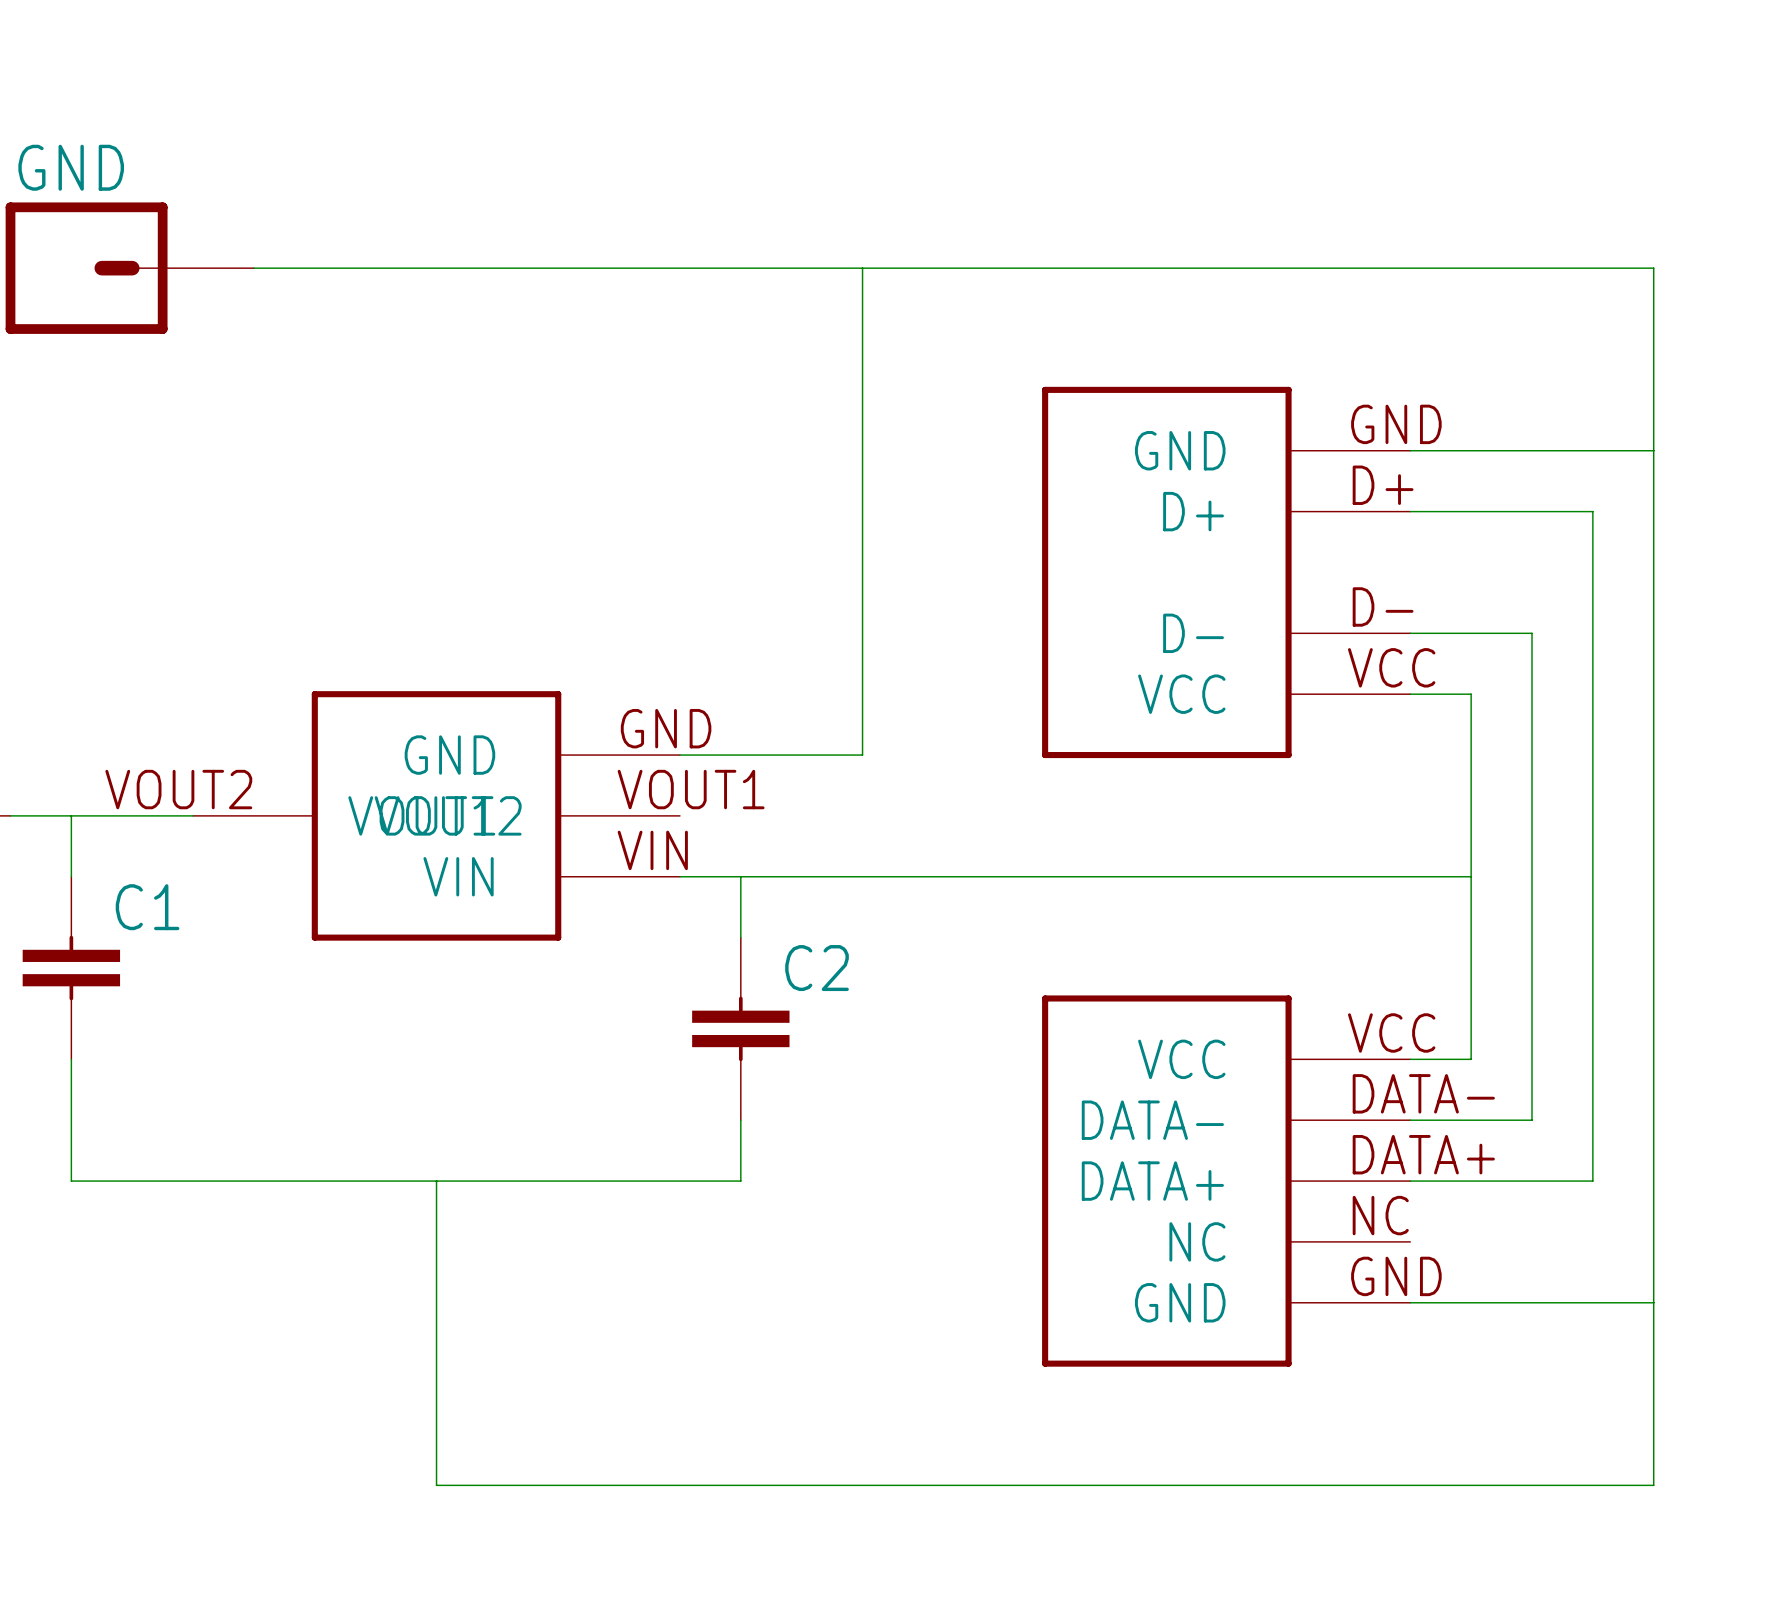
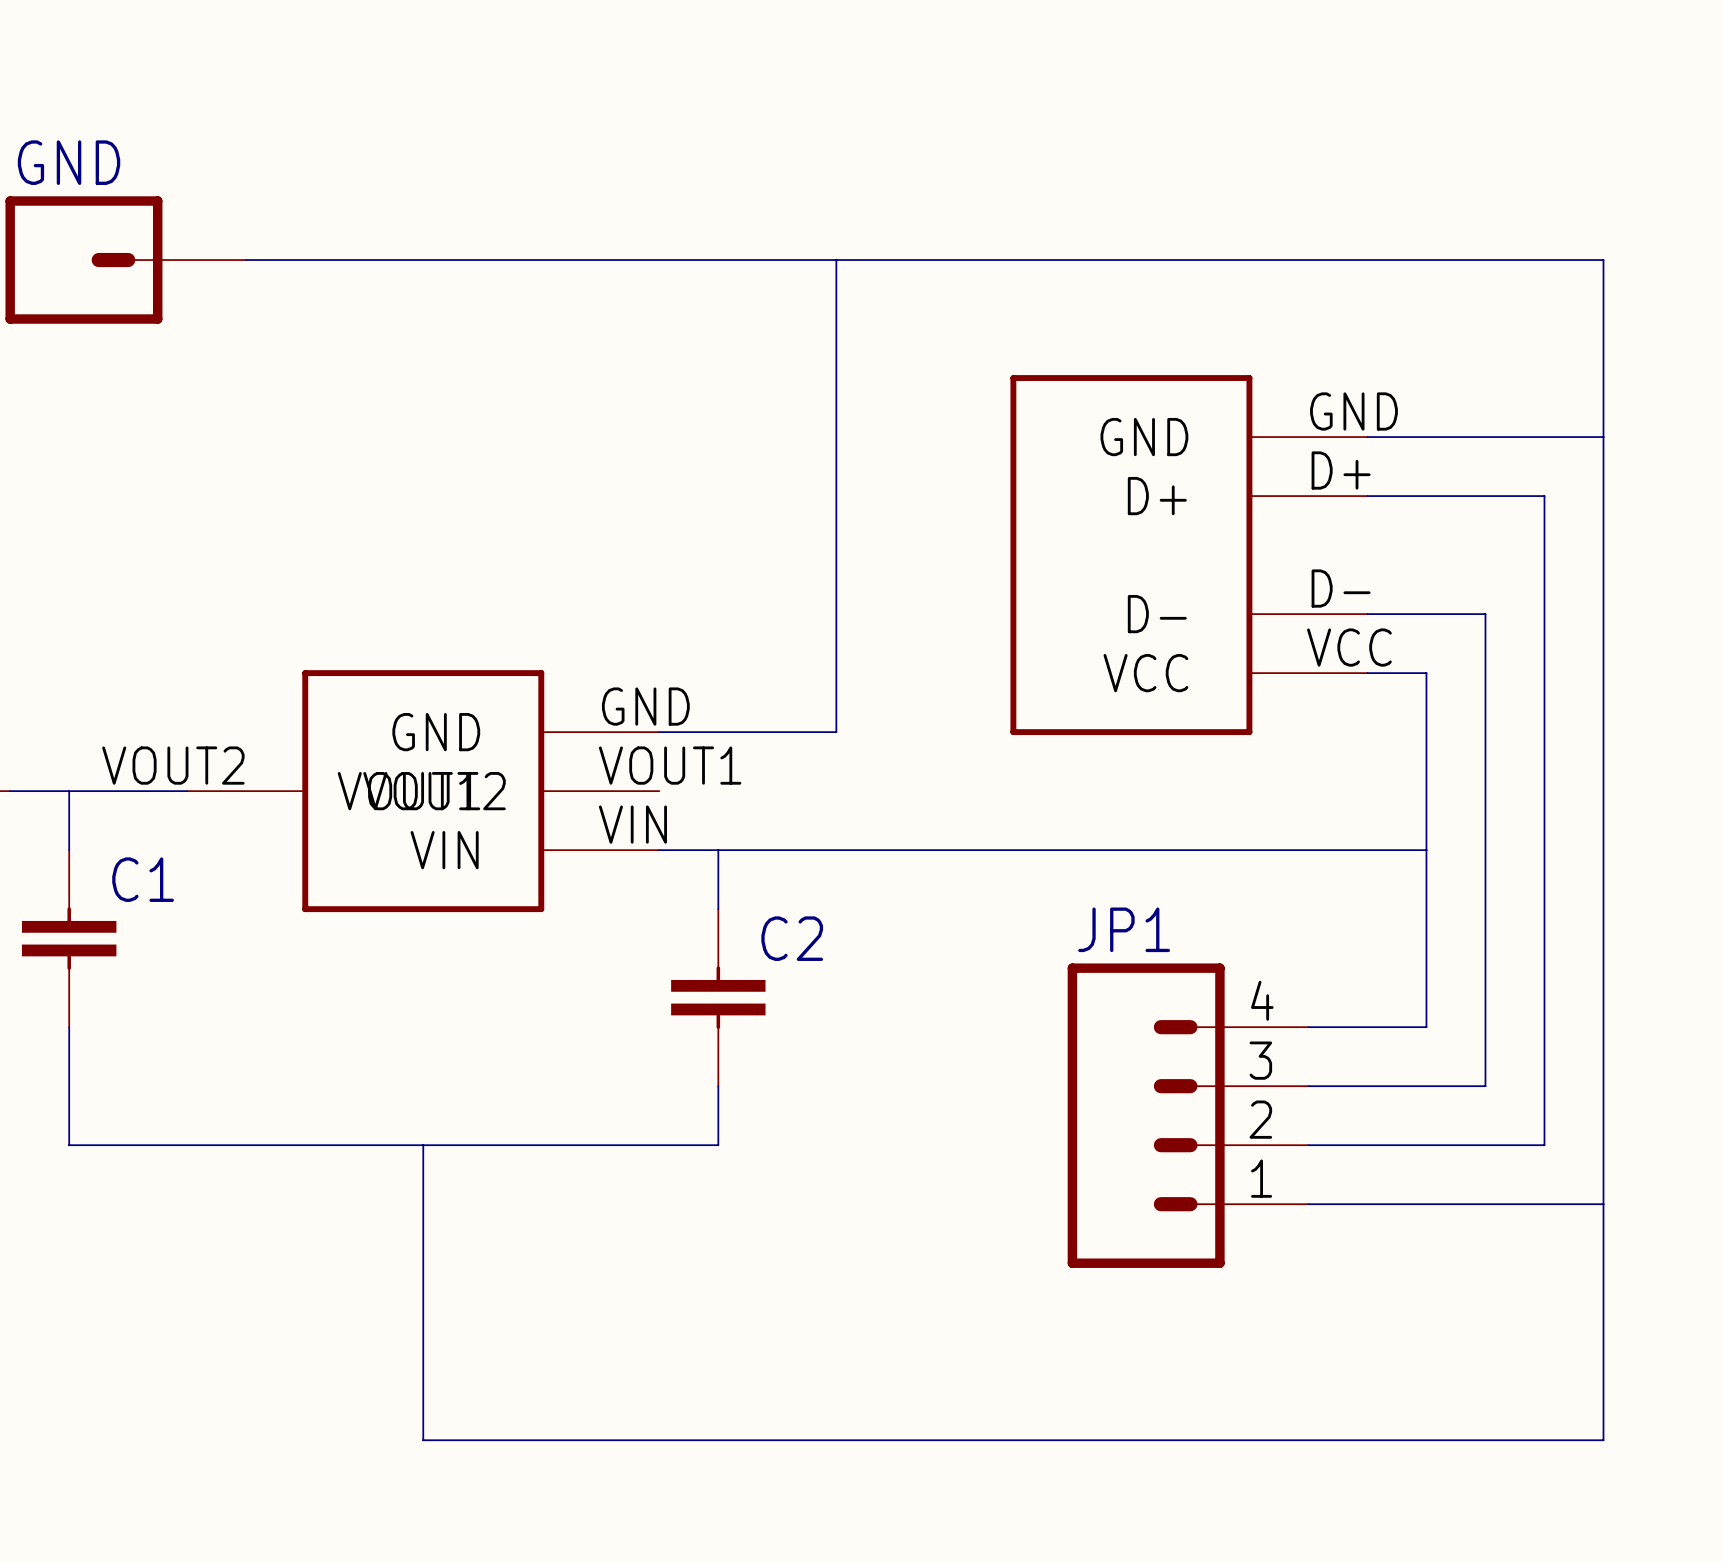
JP1: none -> (1188, 1115)
part: (1226, 1181) -> none
wire: none -> (1308, 1204) (1603, 1204)
wire: (1410, 1302) (1653, 1302) -> none

